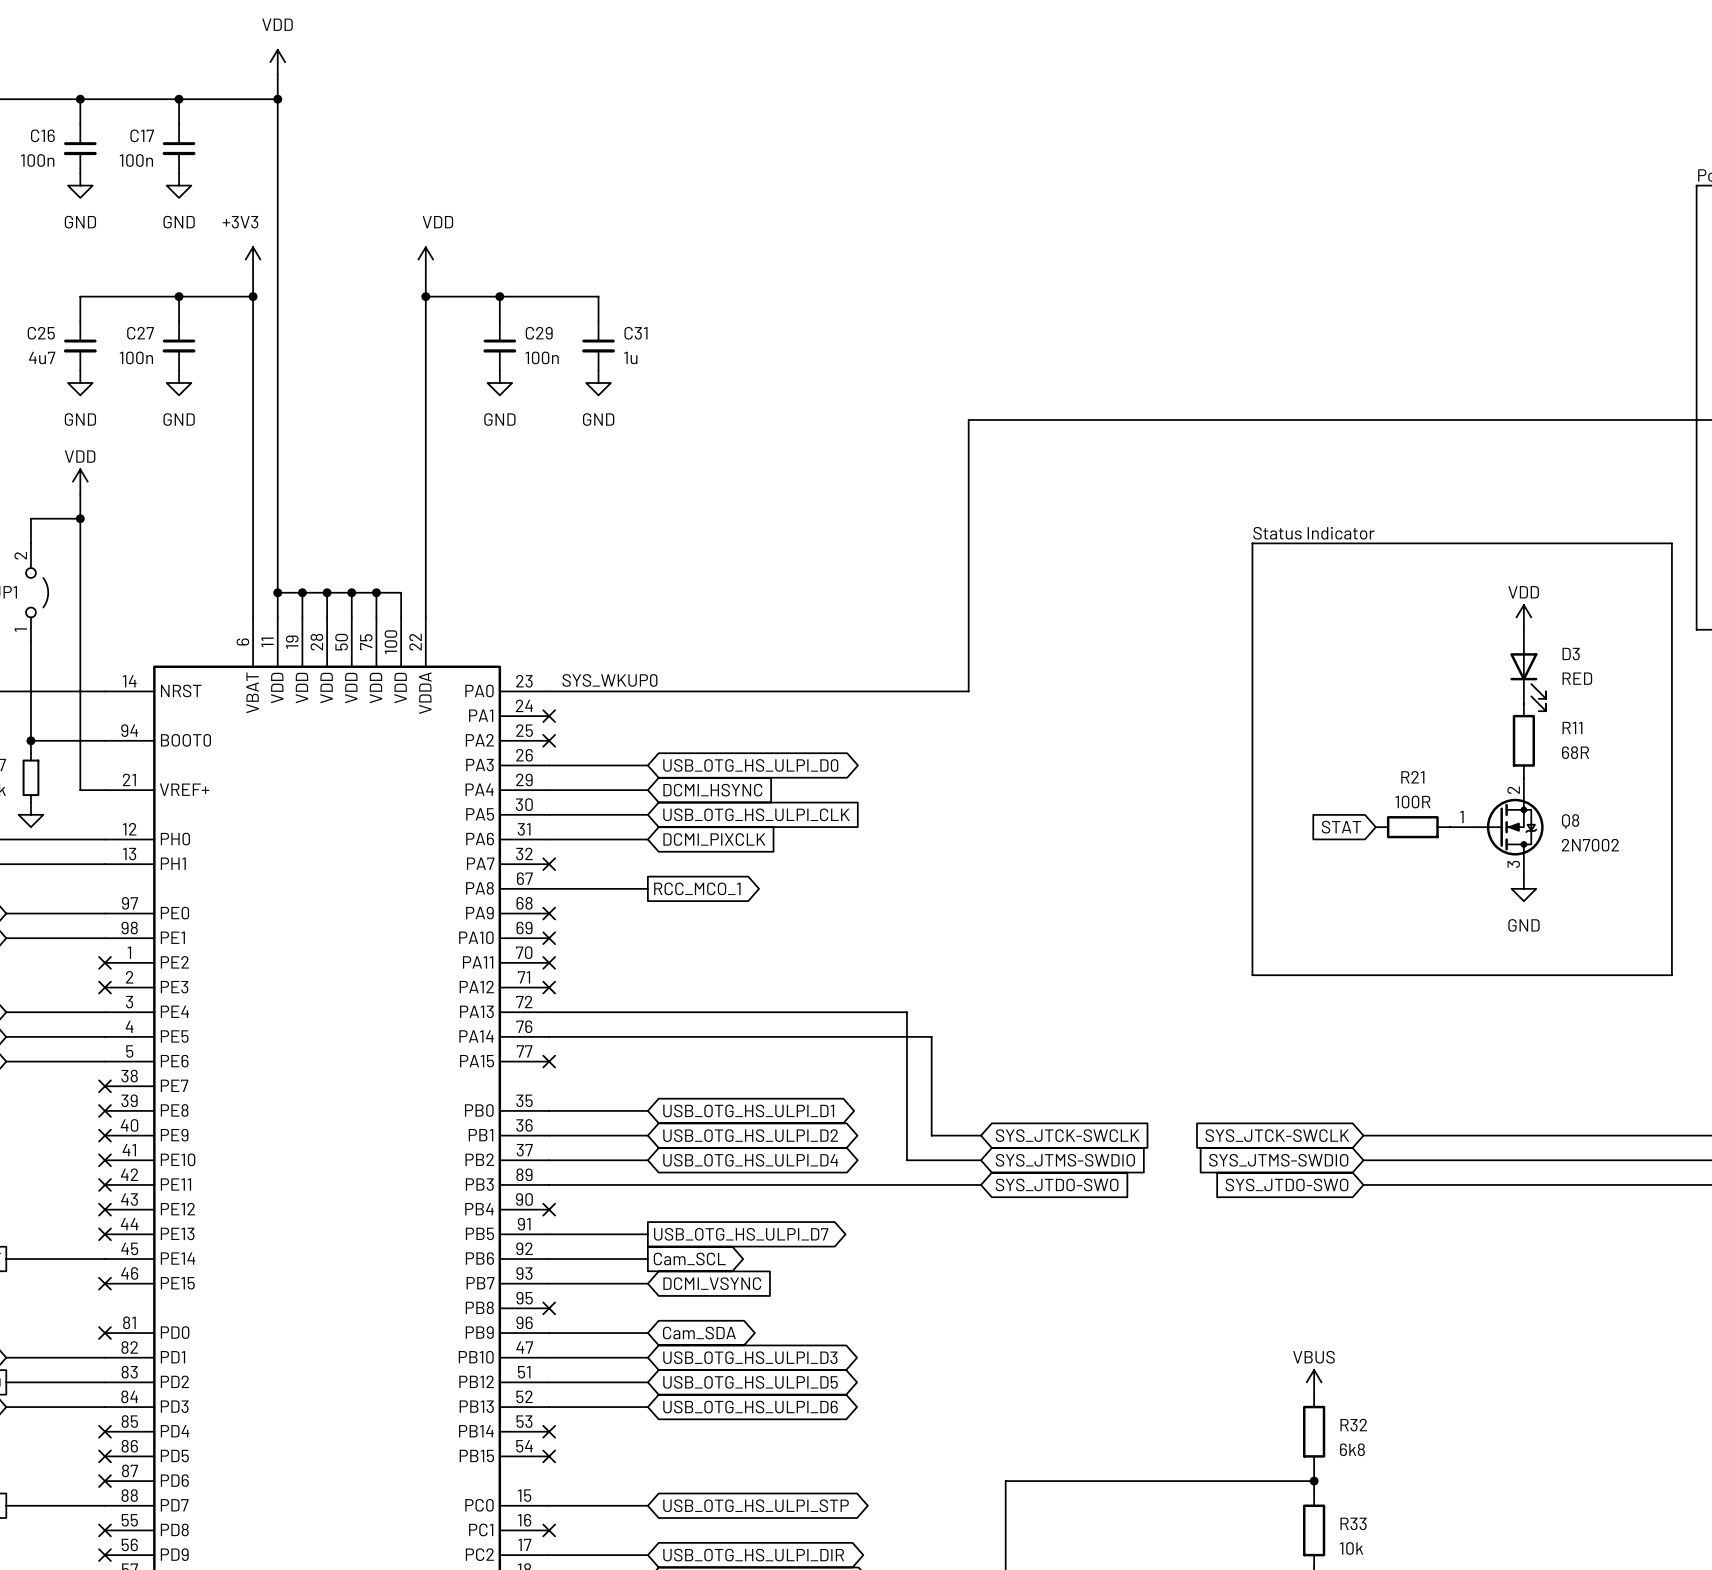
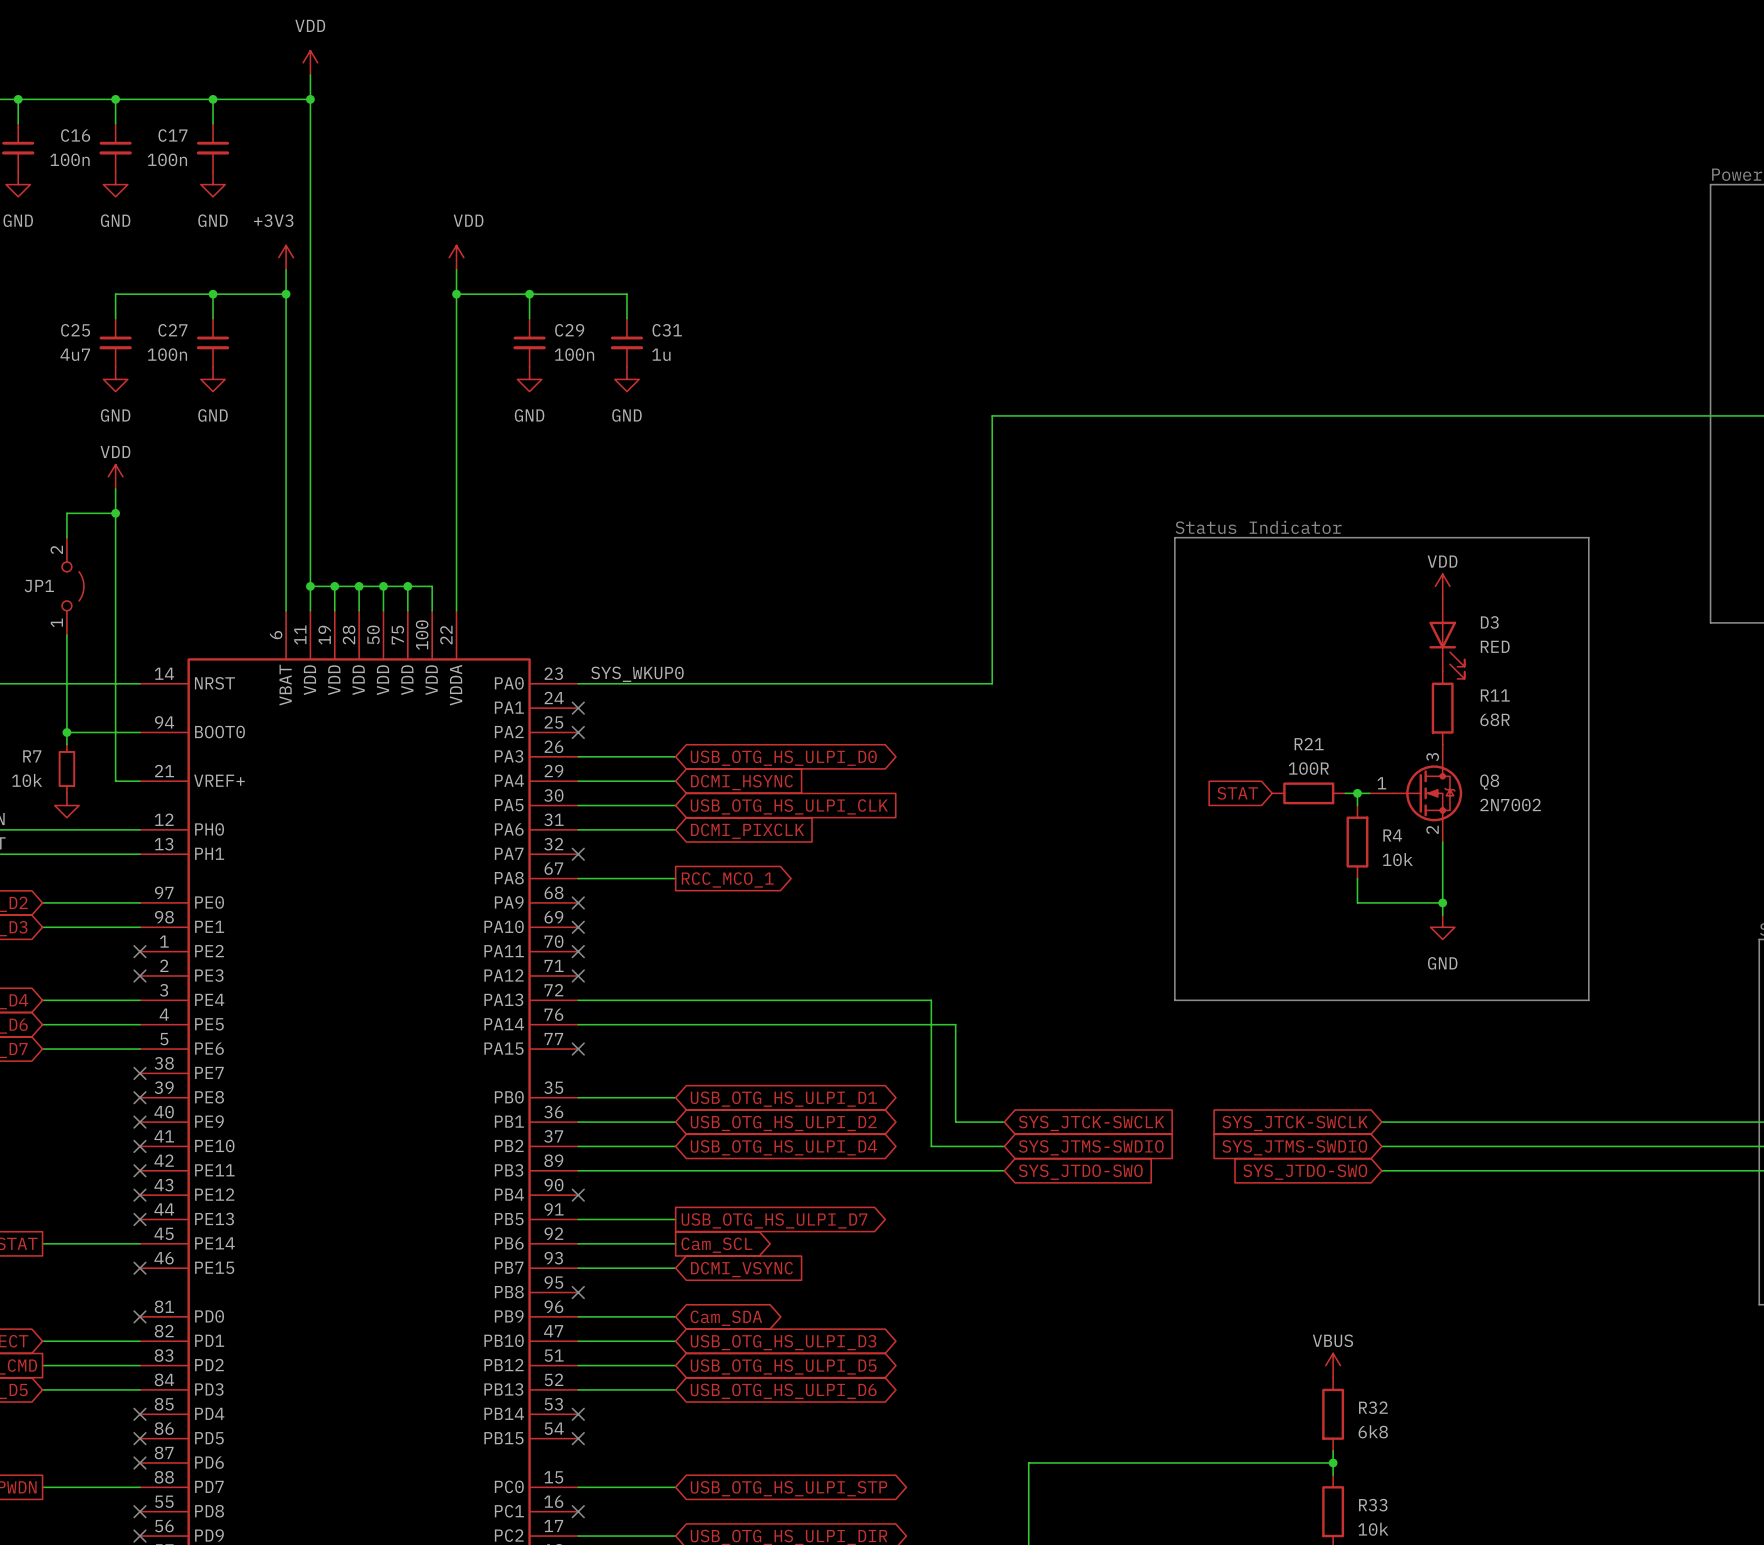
text position: Status Indicator (1313, 533) -> Status Indicator (1258, 527)
line: (1252, 543) (1252, 975) (1671, 975) (1671, 543) (1573, 543) -> (1272, 537) (1174, 537) (1174, 1000) (1588, 1000) (1588, 537)
power symbol position: VDD (1523, 617) -> VDD (1442, 586)
D3 position: (1528, 670) -> (1446, 638)
R11 position: (1523, 740) -> (1442, 708)
wire: none -> (1345, 793) (1369, 793)
wire: none -> (1357, 793) (1357, 805)
junction: none -> (1357, 793)
global label position: STAT (1341, 827) -> STAT (1237, 793)
R21 position: (1412, 827) -> (1308, 793)
Q8 position: (1496, 827) -> (1415, 793)
Q8 flip: as is (1509, 827) -> up-down (1428, 793)
R4: none -> 10k (1357, 842)
wire: none -> (1442, 842) (1442, 915)
wire: none -> (1357, 878) (1357, 902) (1442, 902)
power symbol position: GND (1523, 888) -> GND (1442, 927)
junction: none -> (1442, 902)

